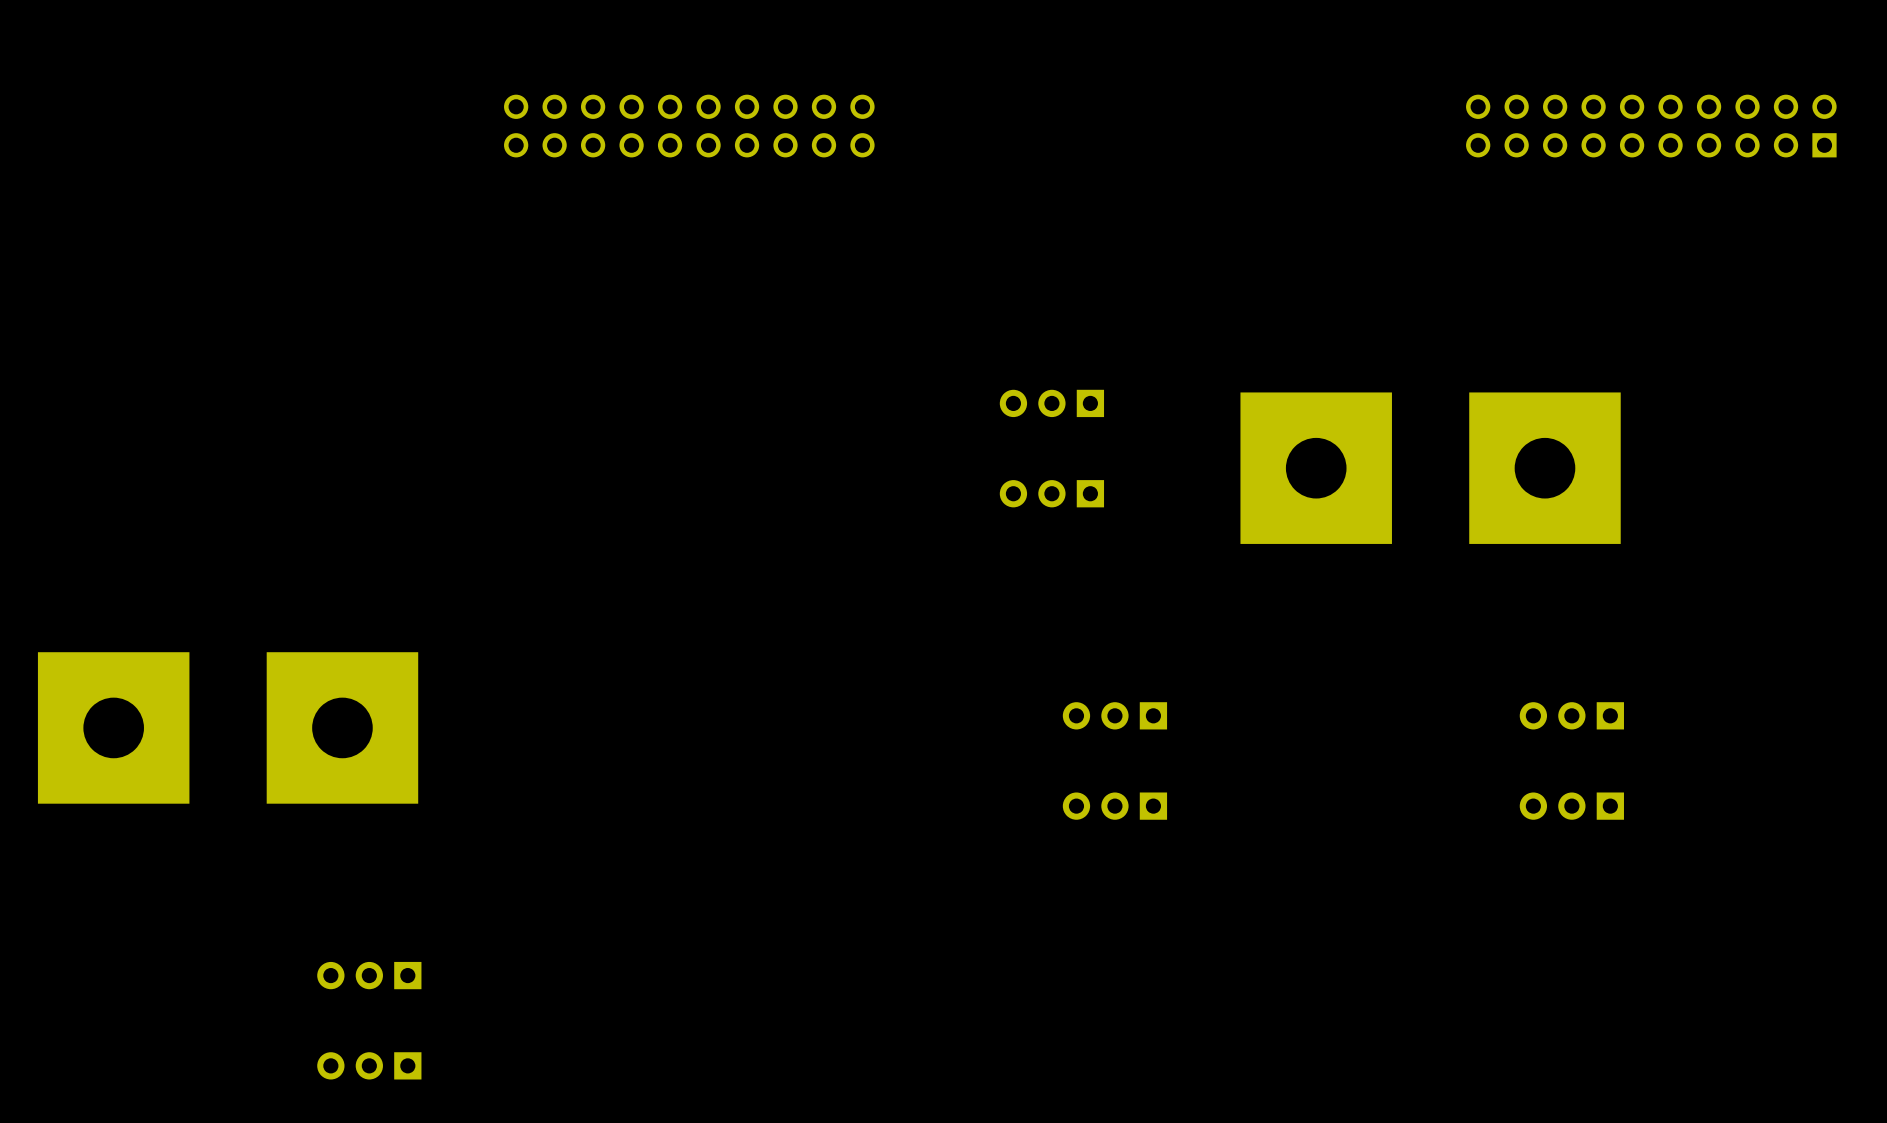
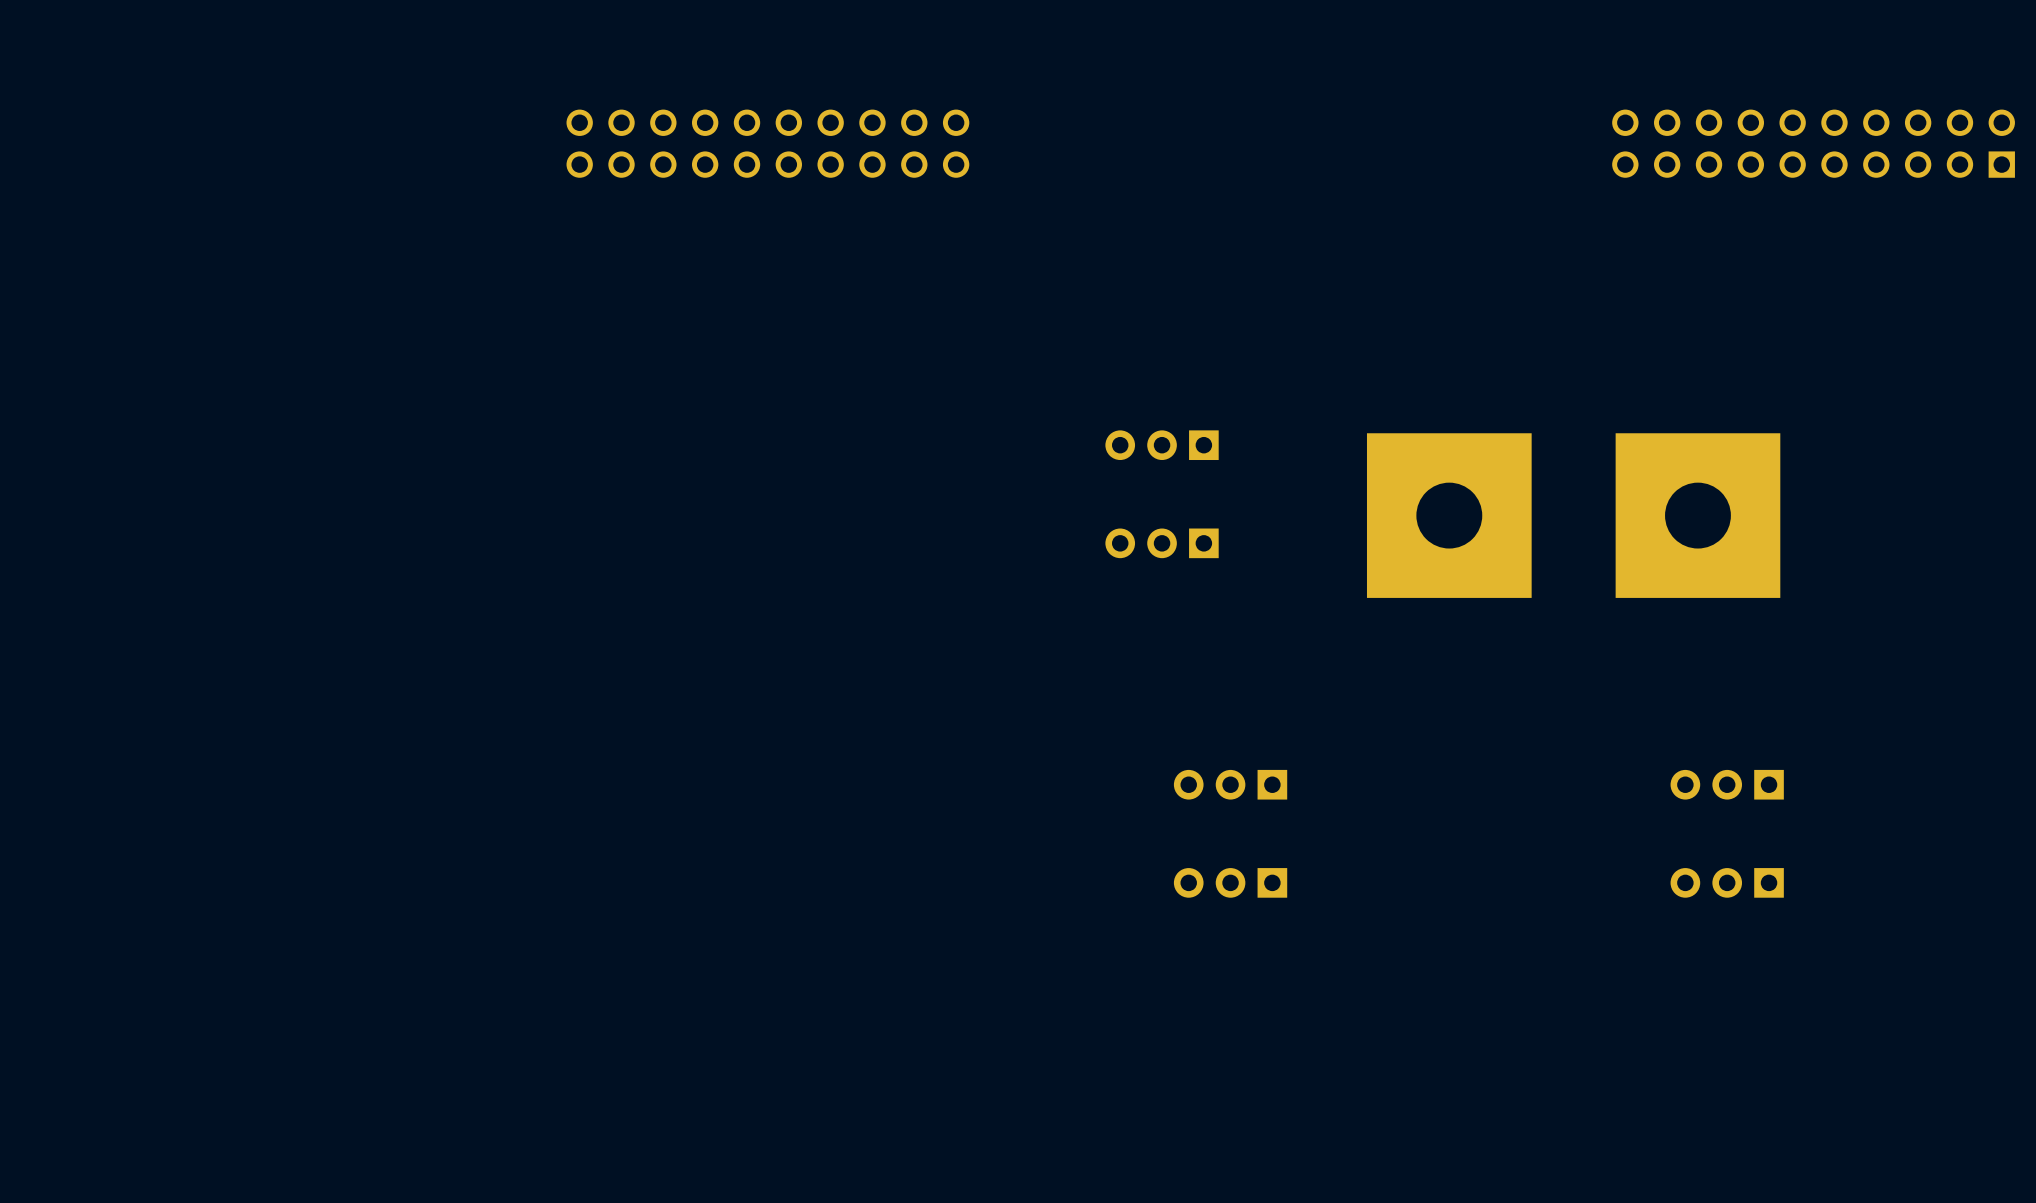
part: (113, 727) -> none
part: (342, 727) -> none
part: (369, 975) -> none
part: (369, 1065) -> none

